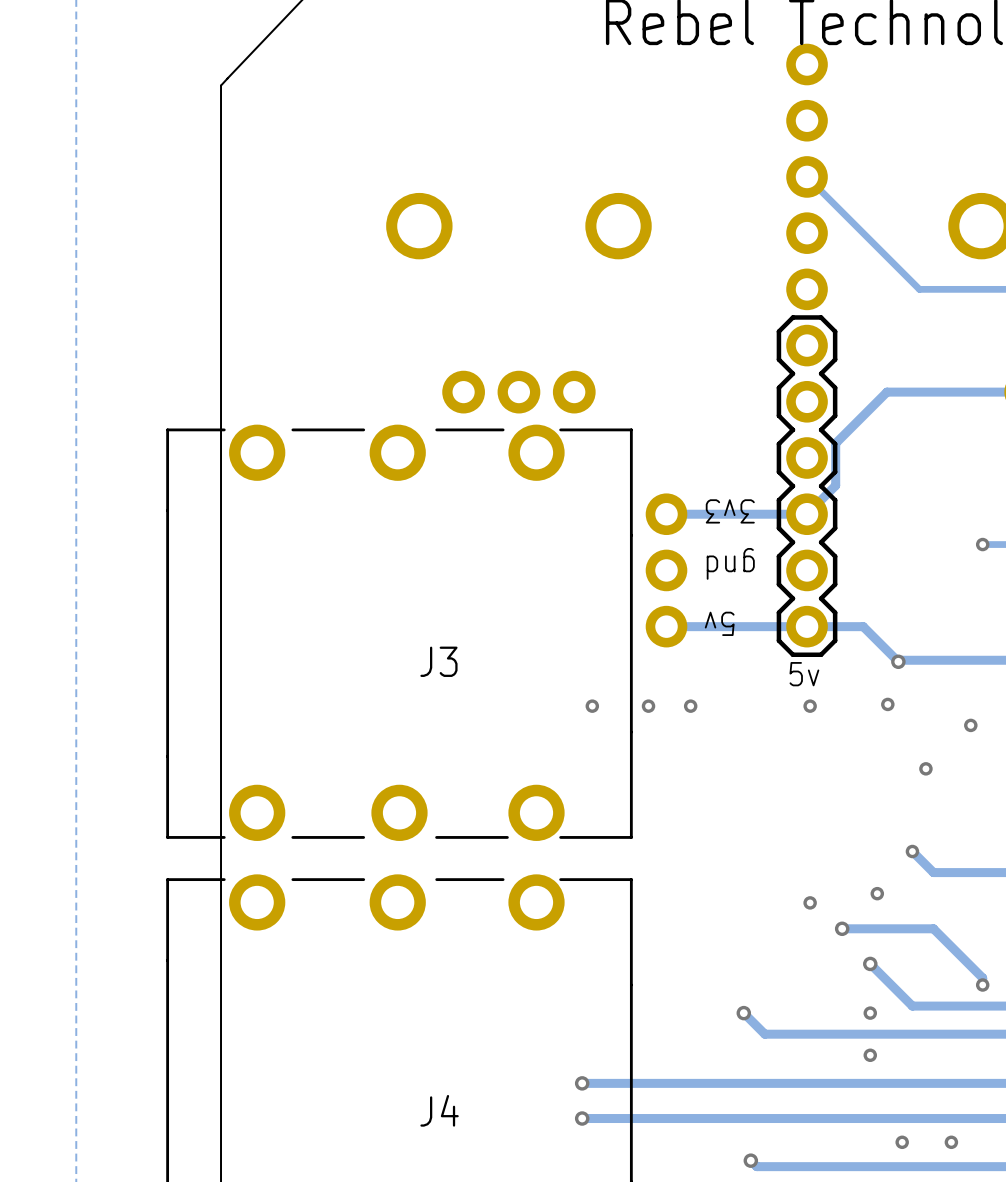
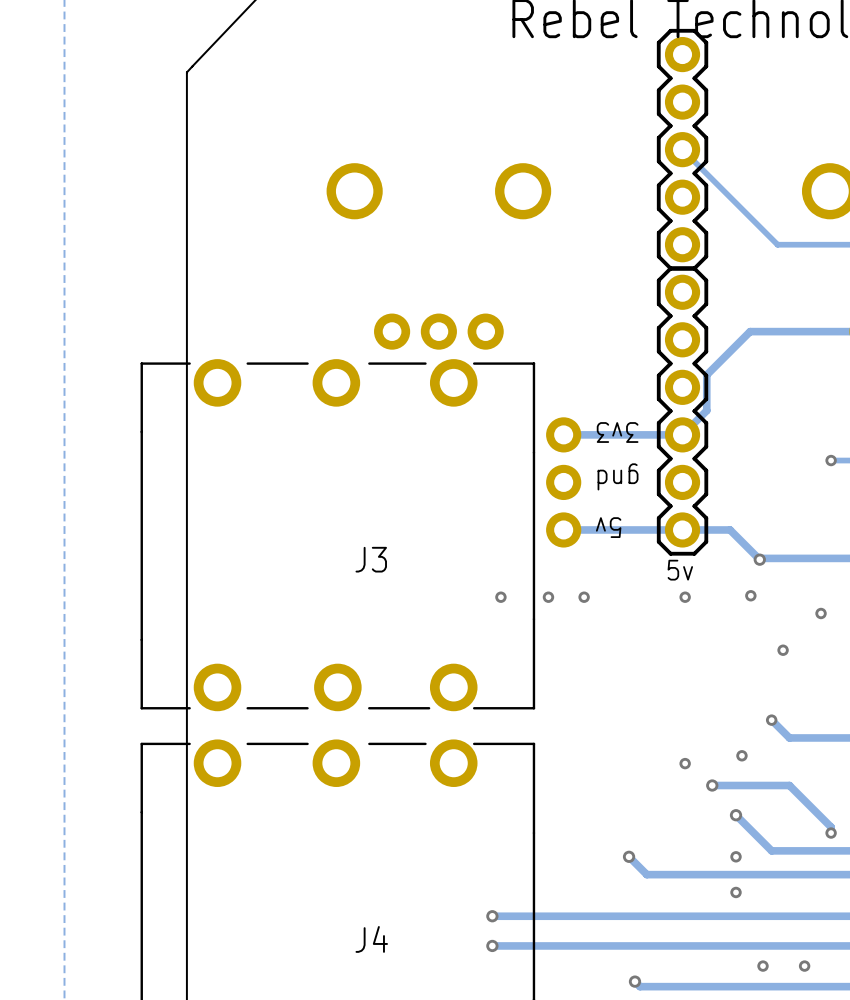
part side: top (807, 176) -> bottom (682, 149)

